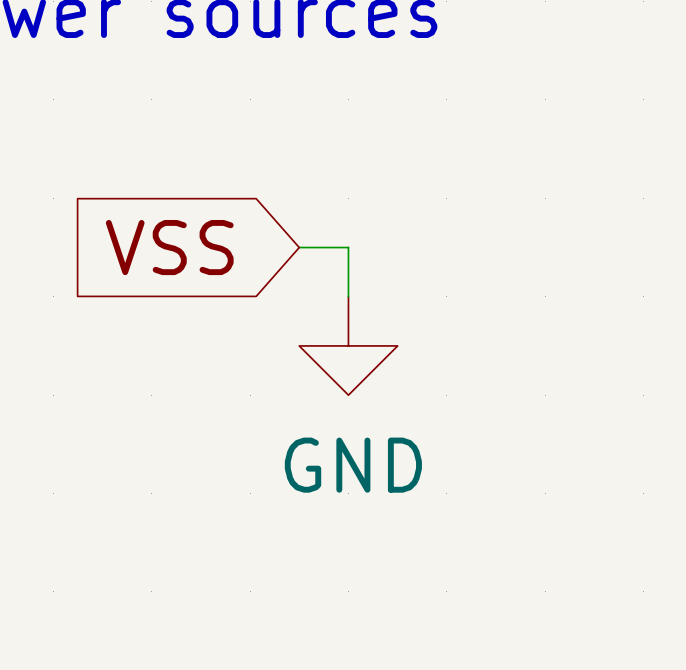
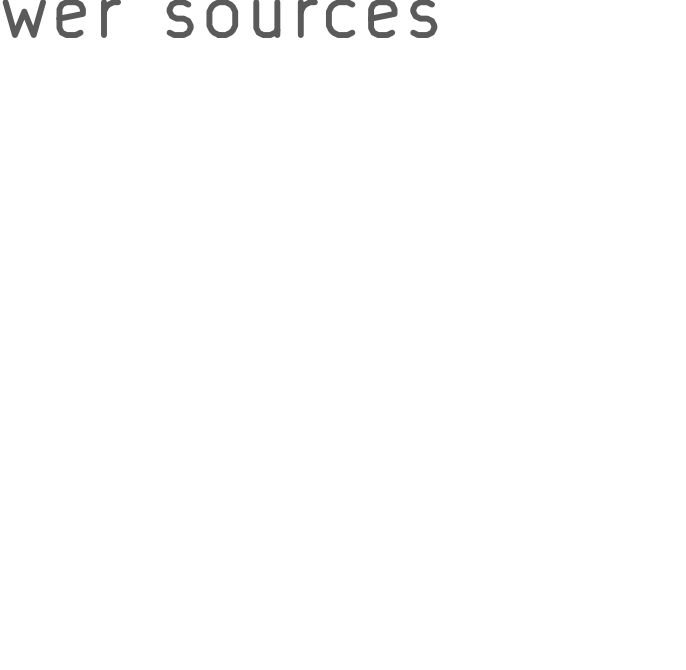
global label: VSS (169, 247) -> none
wire: (299, 247) (348, 247) (348, 296) -> none
power symbol: GND (348, 345) -> none

